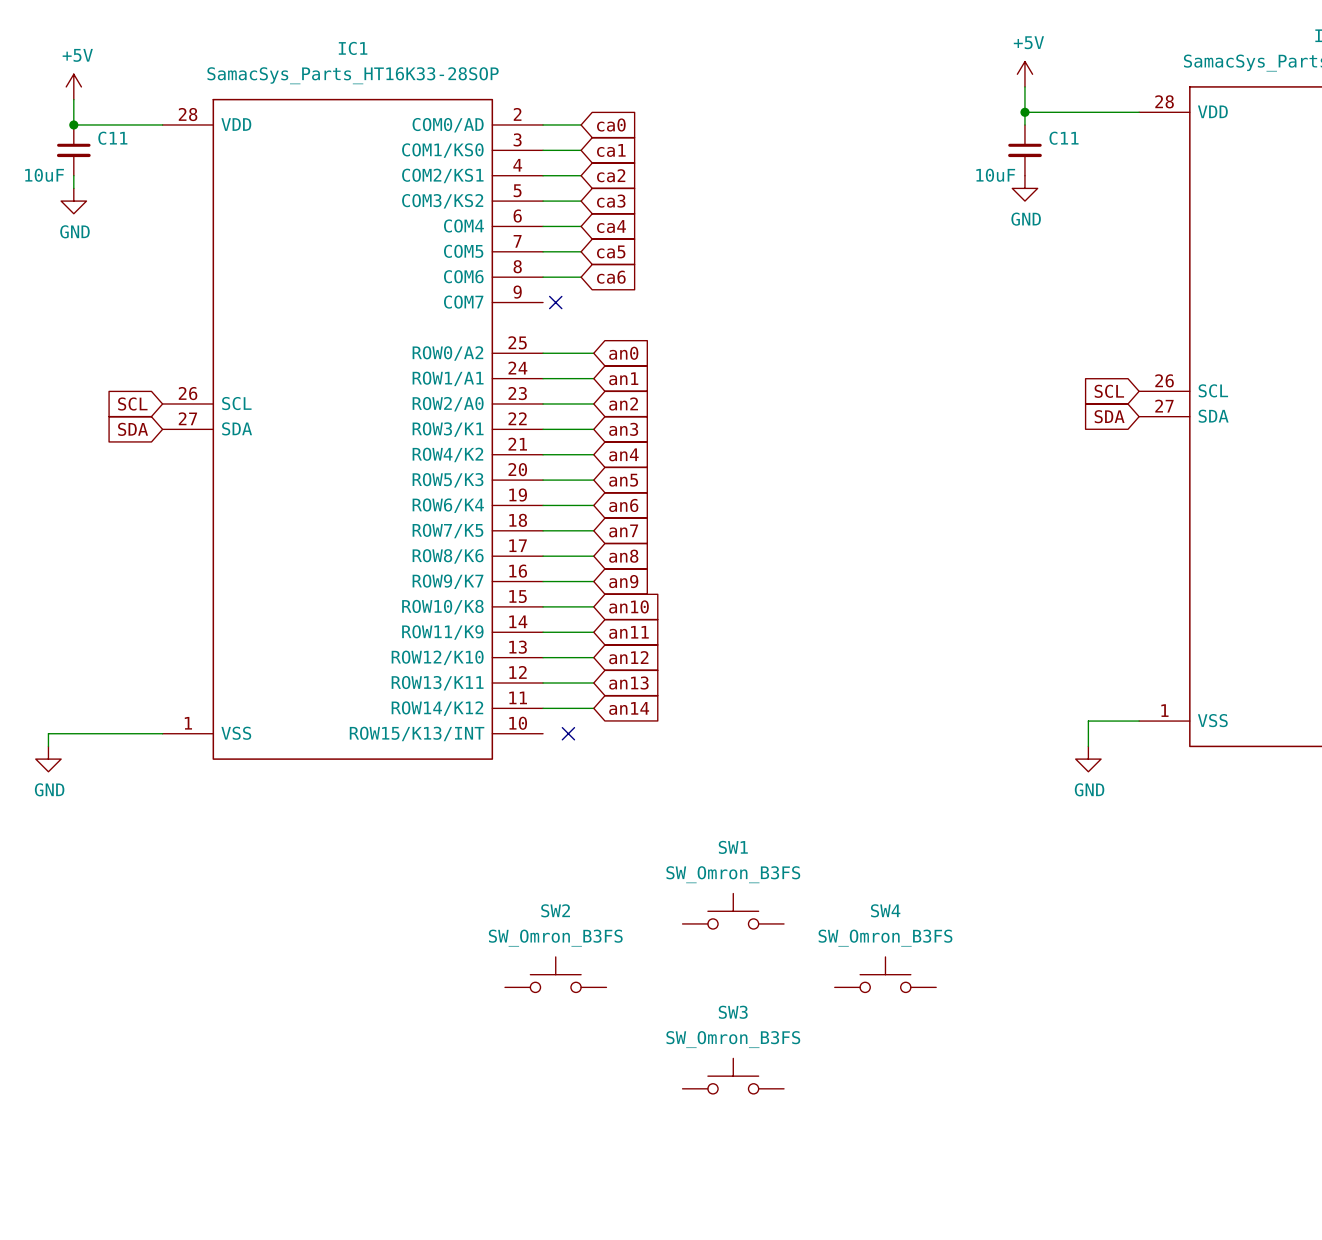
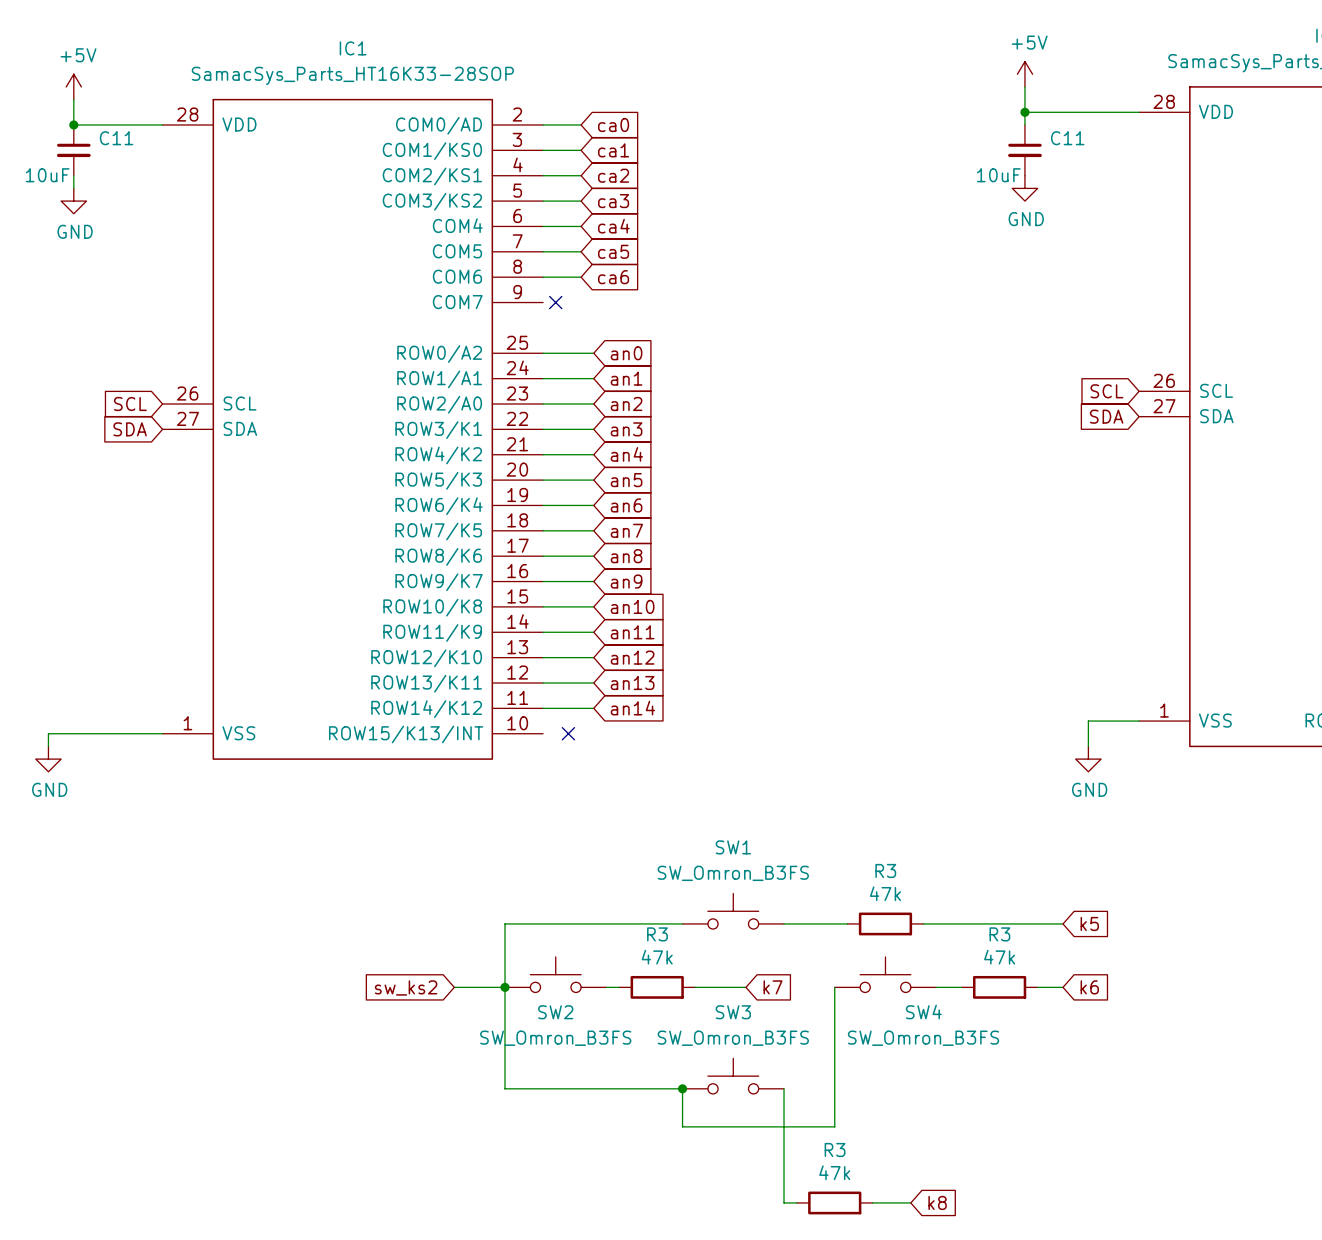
SW2 name position: SW2 (555, 910) -> SW2 (555, 1012)
SW4 name position: SW4 (885, 910) -> SW4 (923, 1011)
wire: none -> (682, 923) (505, 923) (505, 1088) (682, 1088) (682, 1126) (834, 1126) (834, 987)
wire: none -> (784, 923) (847, 923)
R3: none -> 47k (885, 923)
wire: none -> (923, 923) (1063, 923)
global label: none -> k5 (1089, 923)
SW2 value position: SW_Omron_B3FS (555, 938) -> SW_Omron_B3FS (555, 1038)
SW4 value position: SW_Omron_B3FS (885, 938) -> SW_Omron_B3FS (923, 1038)
wire: none -> (454, 987) (505, 987)
junction: none -> (505, 987)
wire: none -> (606, 987) (619, 987)
R3: none -> 47k (657, 987)
wire: none -> (695, 987) (745, 987)
global label: none -> k7 (773, 987)
wire: none -> (936, 987) (961, 987)
R3: none -> 47k (999, 987)
wire: none -> (1037, 987) (1063, 987)
global label: none -> k6 (1089, 987)
global label: none -> sw_ks2 (406, 987)
junction: none -> (682, 1088)
wire: none -> (784, 1088) (784, 1202) (796, 1202)
R3: none -> 47k (834, 1202)
wire: none -> (872, 1202) (910, 1202)
global label: none -> k8 (937, 1202)

